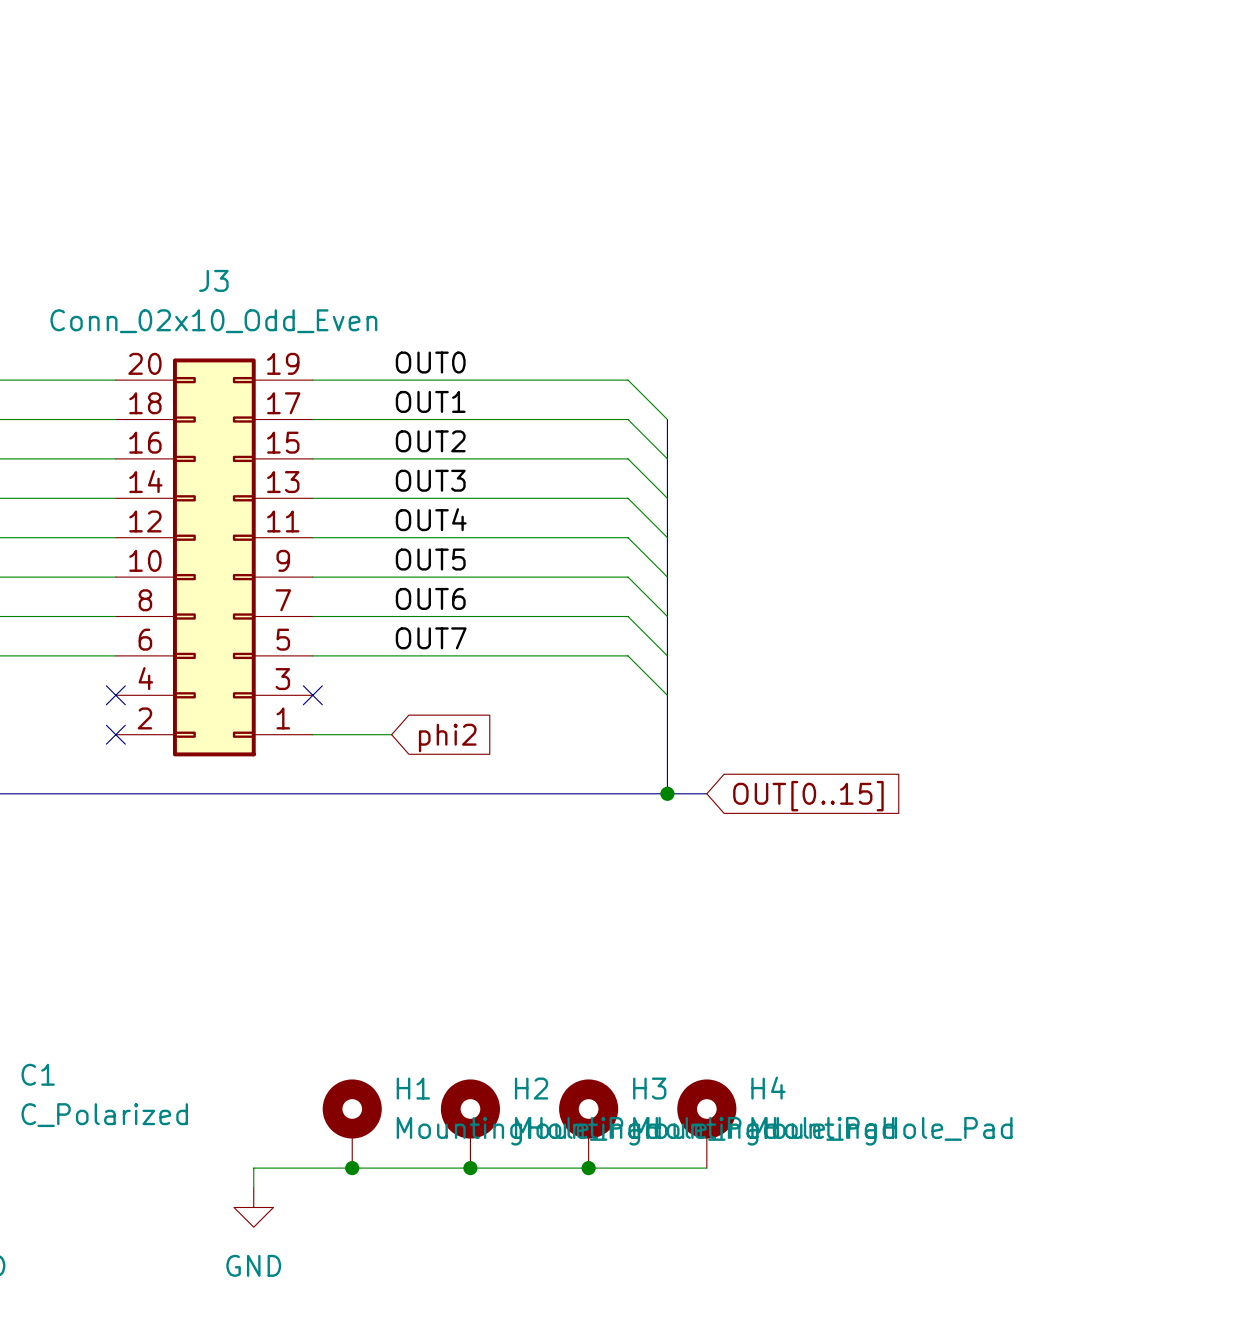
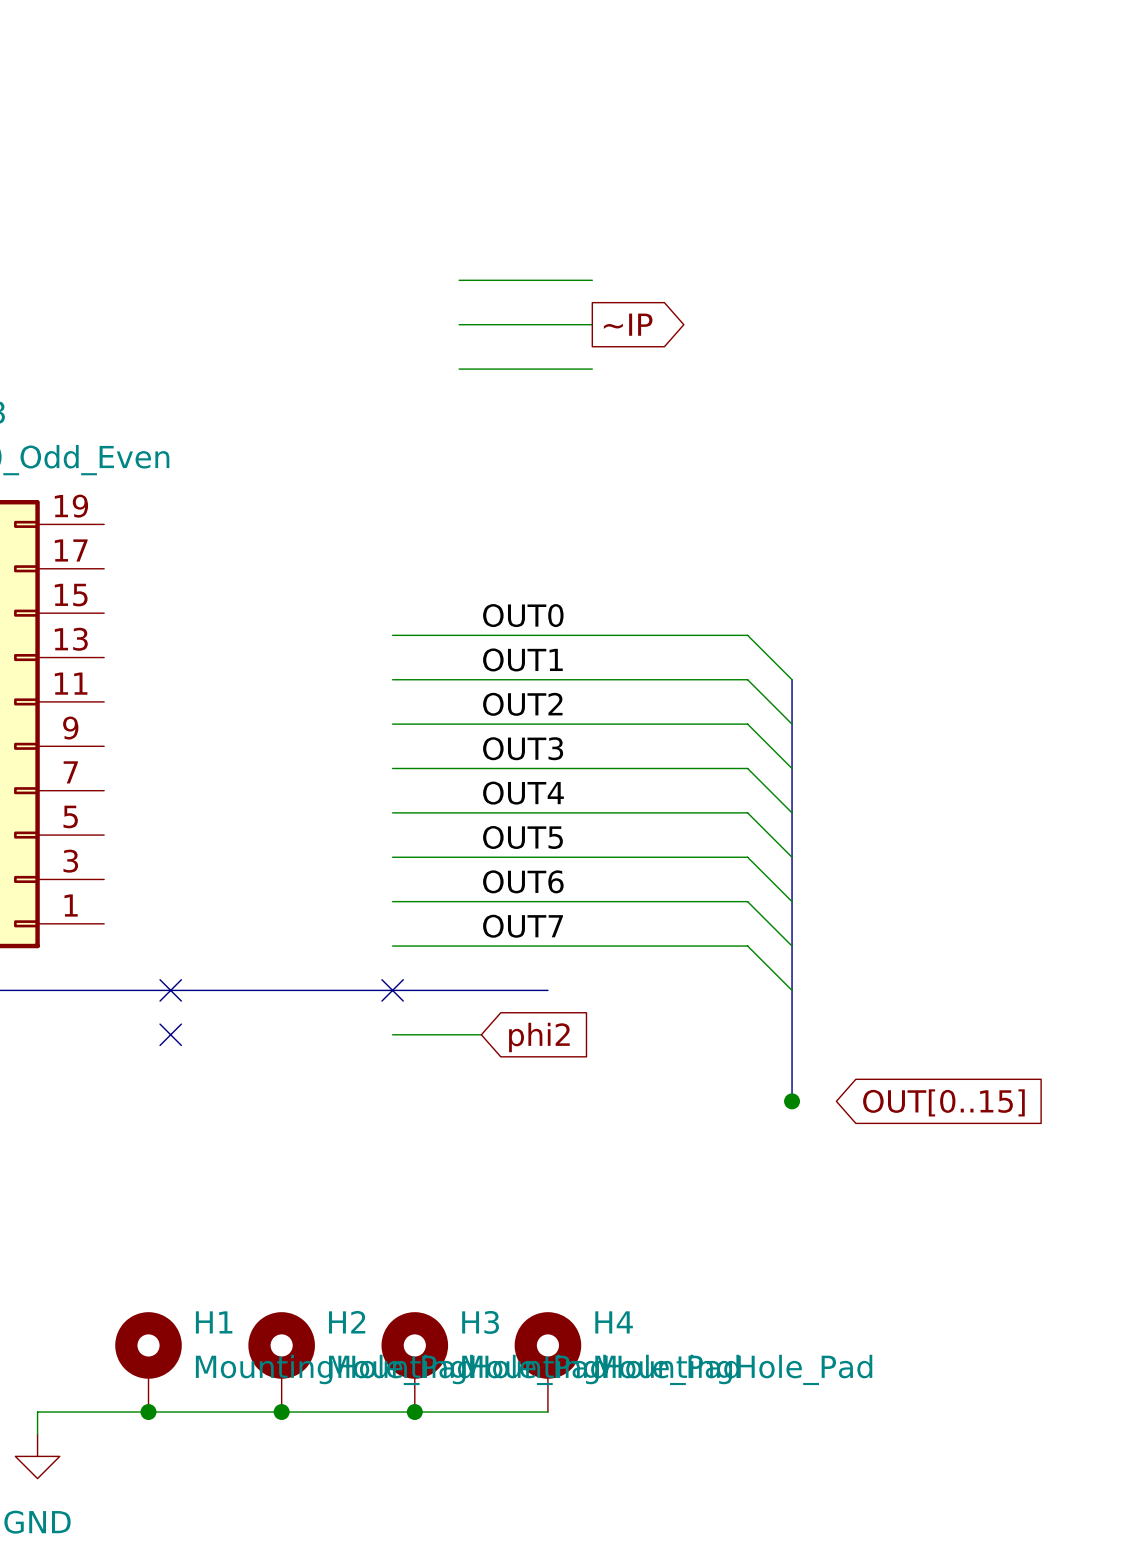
wire: none -> (459, 280) (592, 280)
wire: none -> (459, 324) (592, 324)
global label: none -> ~IP (628, 324)
wire: none -> (459, 369) (592, 369)
label position: OUT0 (430, 362) -> OUT0 (523, 615)
wire: (312, 380) (628, 380) (667, 419) -> (392, 635) (747, 635) (792, 679)
label position: OUT1 (430, 401) -> OUT1 (522, 659)
wire: (312, 419) (628, 419) (667, 458) -> (392, 679) (747, 679) (792, 724)
bus: (667, 419) (667, 793) -> (792, 679) (792, 1101)
label position: OUT2 (430, 441) -> OUT2 (522, 704)
wire: (312, 458) (628, 458) (667, 498) -> (392, 724) (747, 724) (792, 768)
label position: OUT3 (430, 480) -> OUT3 (523, 748)
wire: (312, 498) (628, 498) (667, 537) -> (392, 768) (747, 768) (792, 812)
label position: OUT4 (431, 519) -> OUT4 (523, 793)
wire: (312, 537) (628, 537) (667, 577) -> (392, 812) (747, 812) (792, 857)
label position: OUT5 (430, 559) -> OUT5 (522, 837)
wire: (312, 577) (628, 577) (667, 616) -> (392, 857) (747, 857) (792, 901)
label position: OUT6 (430, 598) -> OUT6 (523, 881)
wire: (312, 616) (628, 616) (667, 655) -> (392, 901) (747, 901) (792, 946)
label position: OUT7 (431, 638) -> OUT7 (523, 926)
wire: (312, 655) (628, 655) (667, 695) -> (392, 946) (747, 946) (792, 990)
no-connect mark: (312, 695) -> none
wire: (312, 734) (391, 734) -> (392, 1034) (481, 1034)
global label position: phi2 (447, 737) -> phi2 (539, 1037)
no-connect mark: none -> (170, 990)
no-connect mark: none -> (392, 990)
junction: (667, 793) -> none
global label position: OUT[0..15] (808, 796) -> OUT[0..15] (943, 1102)
no-connect mark: none -> (170, 1034)
junction: none -> (792, 1101)

